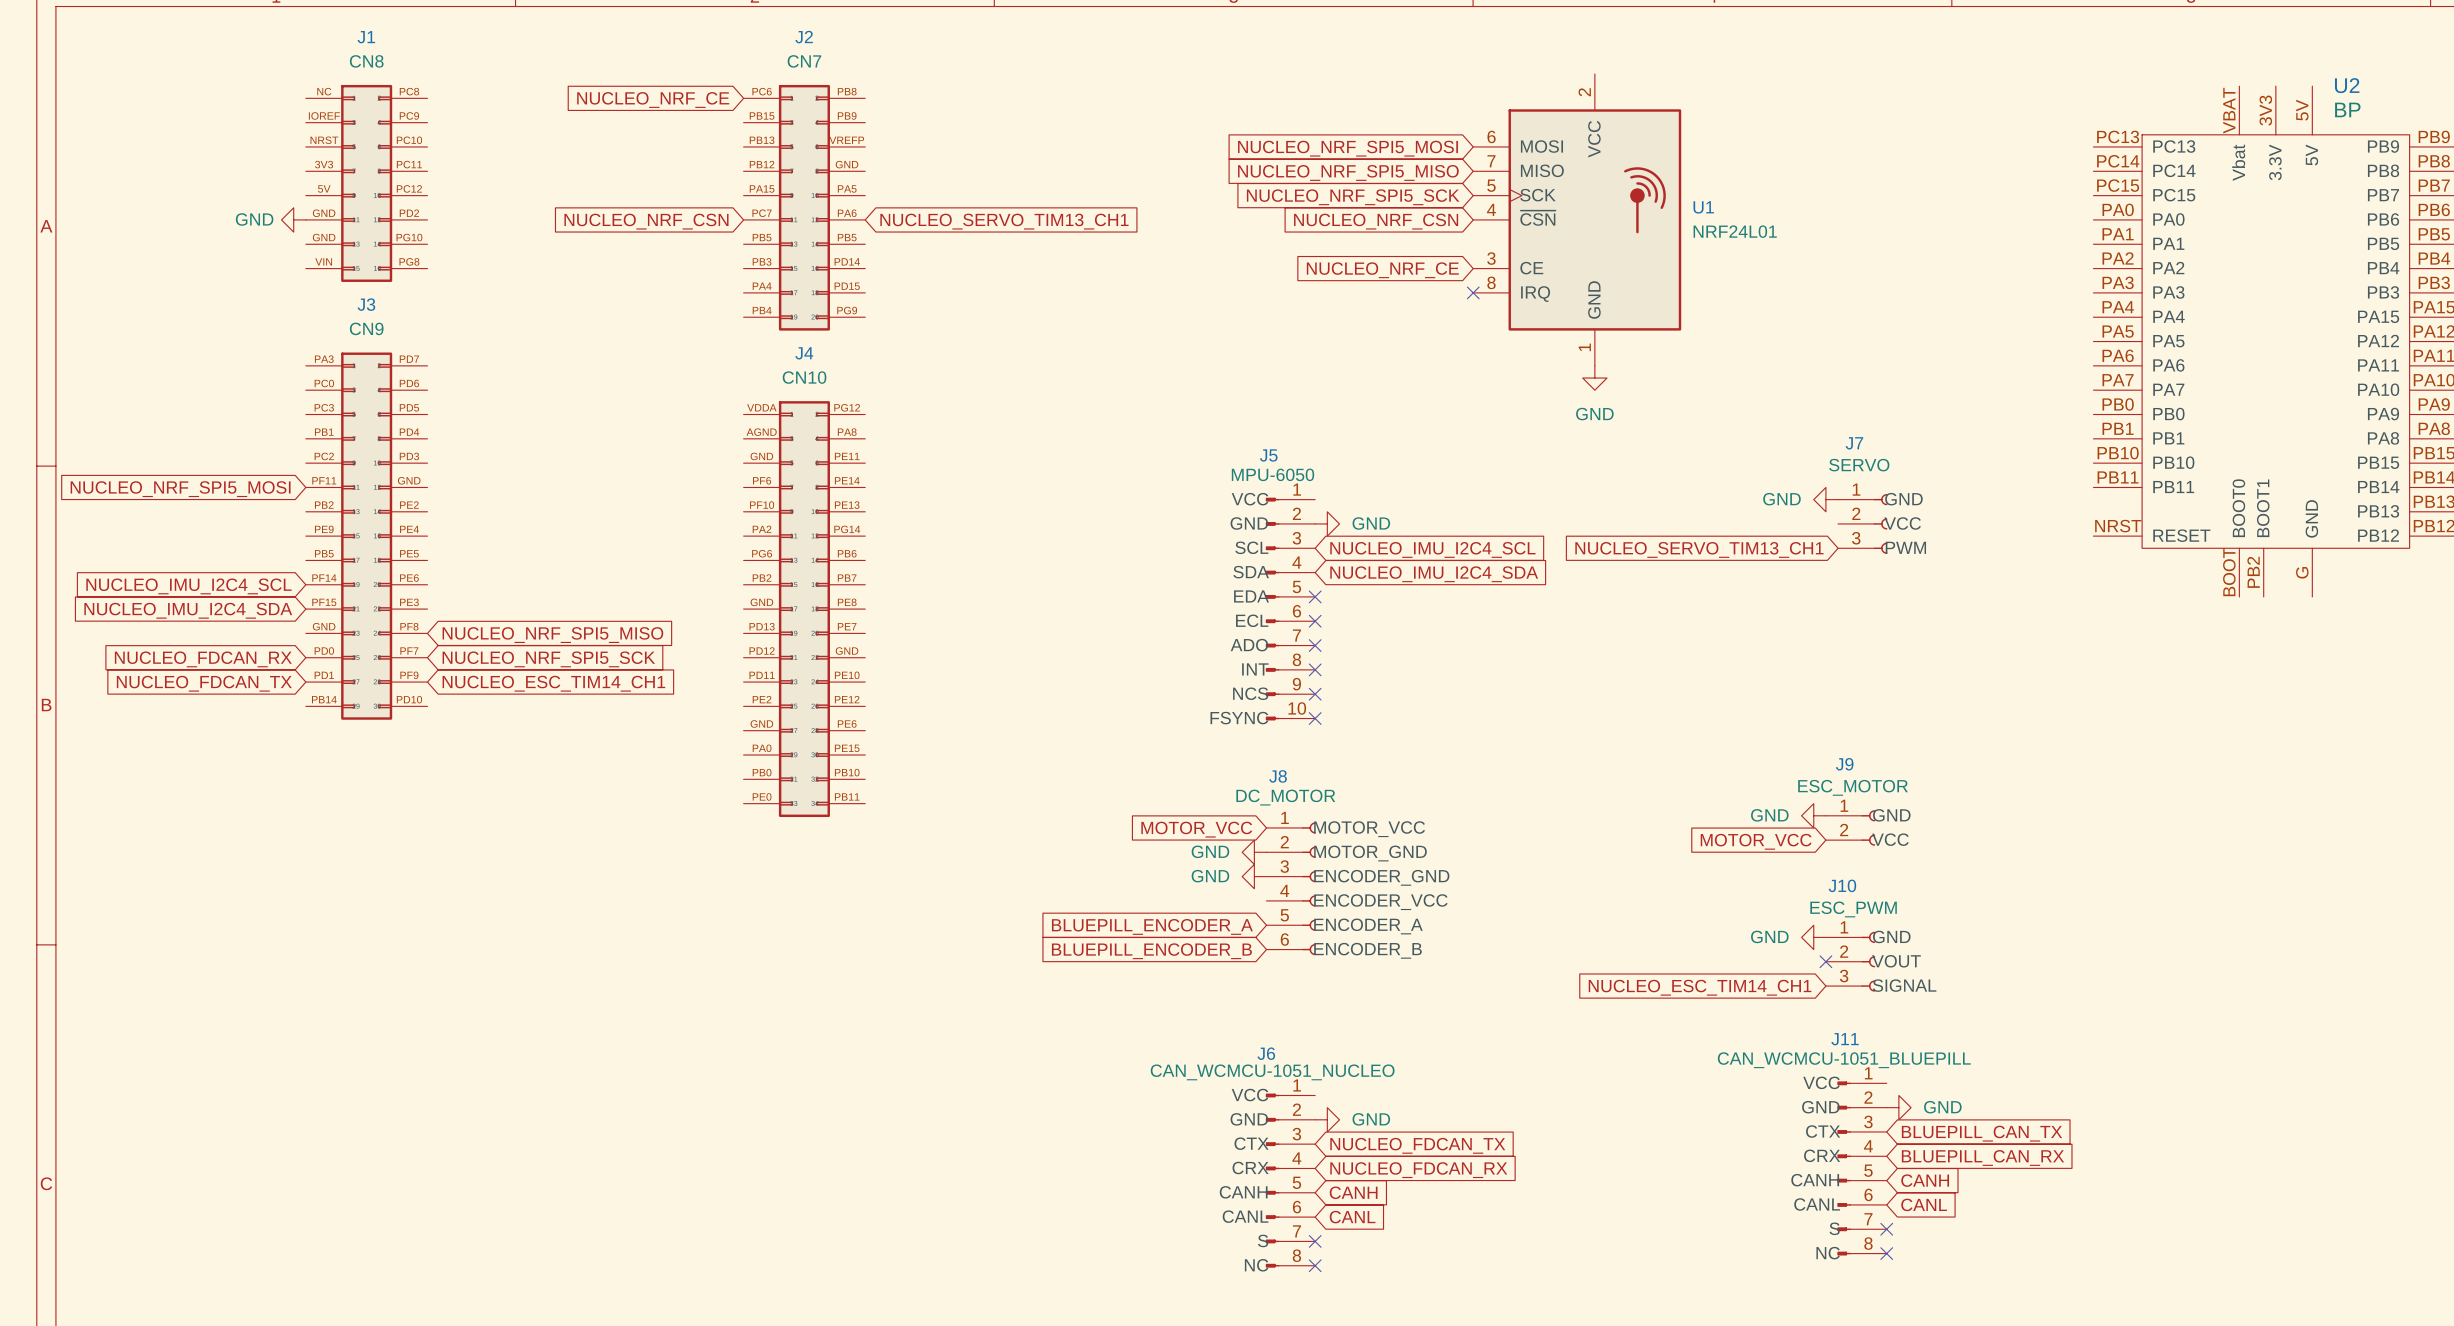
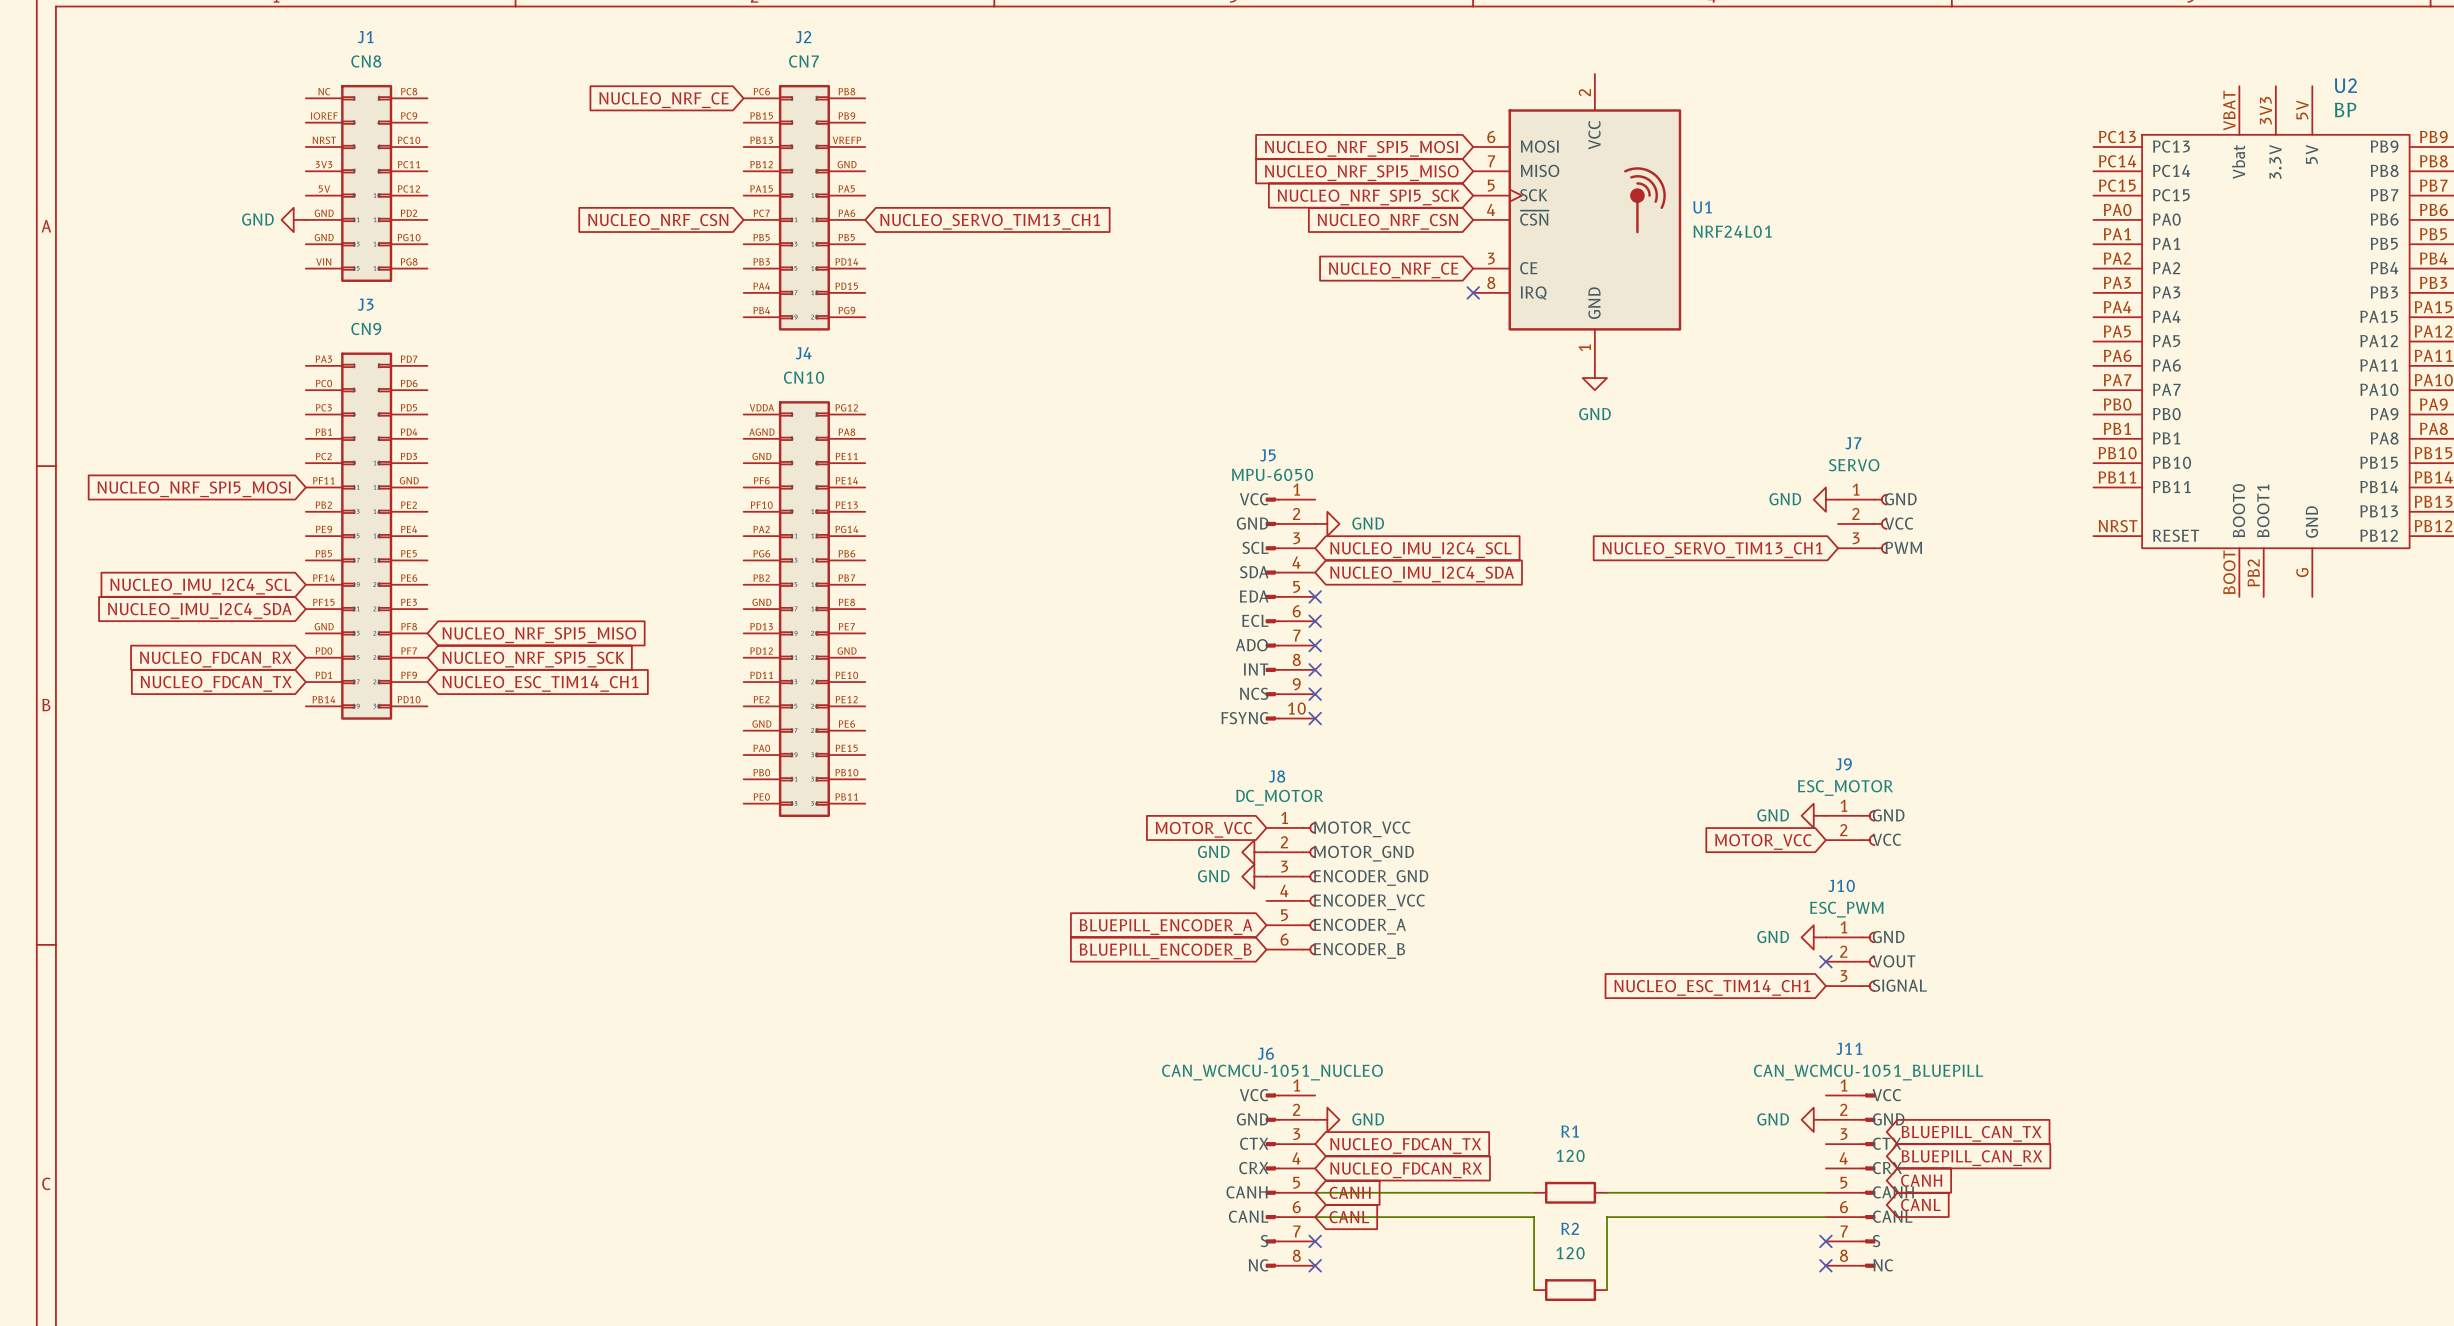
power symbol rotation: 0° (1898, 1107) -> 180° (1813, 1119)
power symbol position: GND (1898, 1107) -> GND (1813, 1119)
J11 flip: as is (1844, 1168) -> left-right (1868, 1180)
wire: none -> (1315, 1192) (1534, 1192)
R1: none -> 120 (1570, 1192)
wire: none -> (1607, 1192) (1825, 1192)
wire: none -> (1315, 1217) (1534, 1217) (1534, 1290)
wire: none -> (1825, 1217) (1607, 1217) (1607, 1290)
no-connect mark: (1886, 1229) -> none
no-connect mark: none -> (1825, 1241)
no-connect mark: (1886, 1253) -> none
no-connect mark: none -> (1825, 1265)
R2: none -> 120 (1570, 1290)

